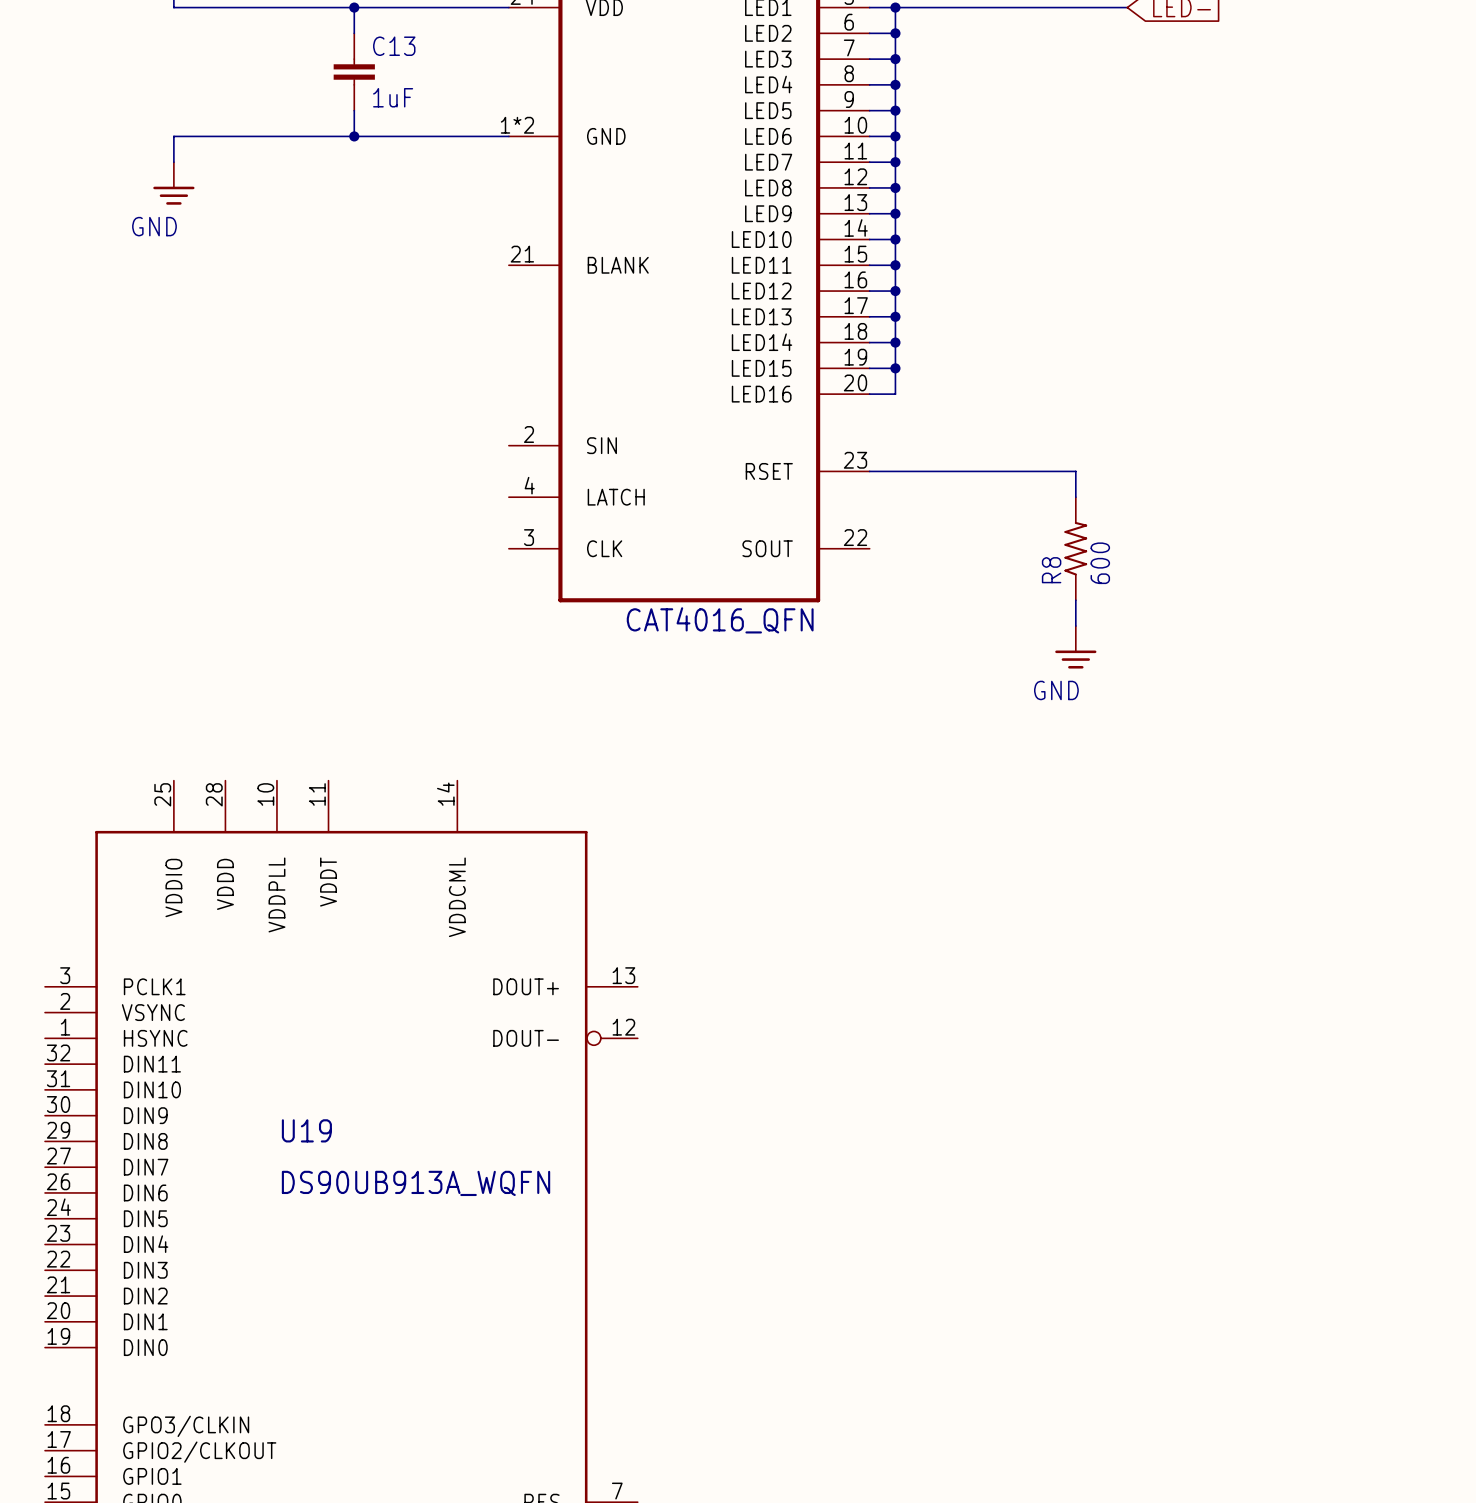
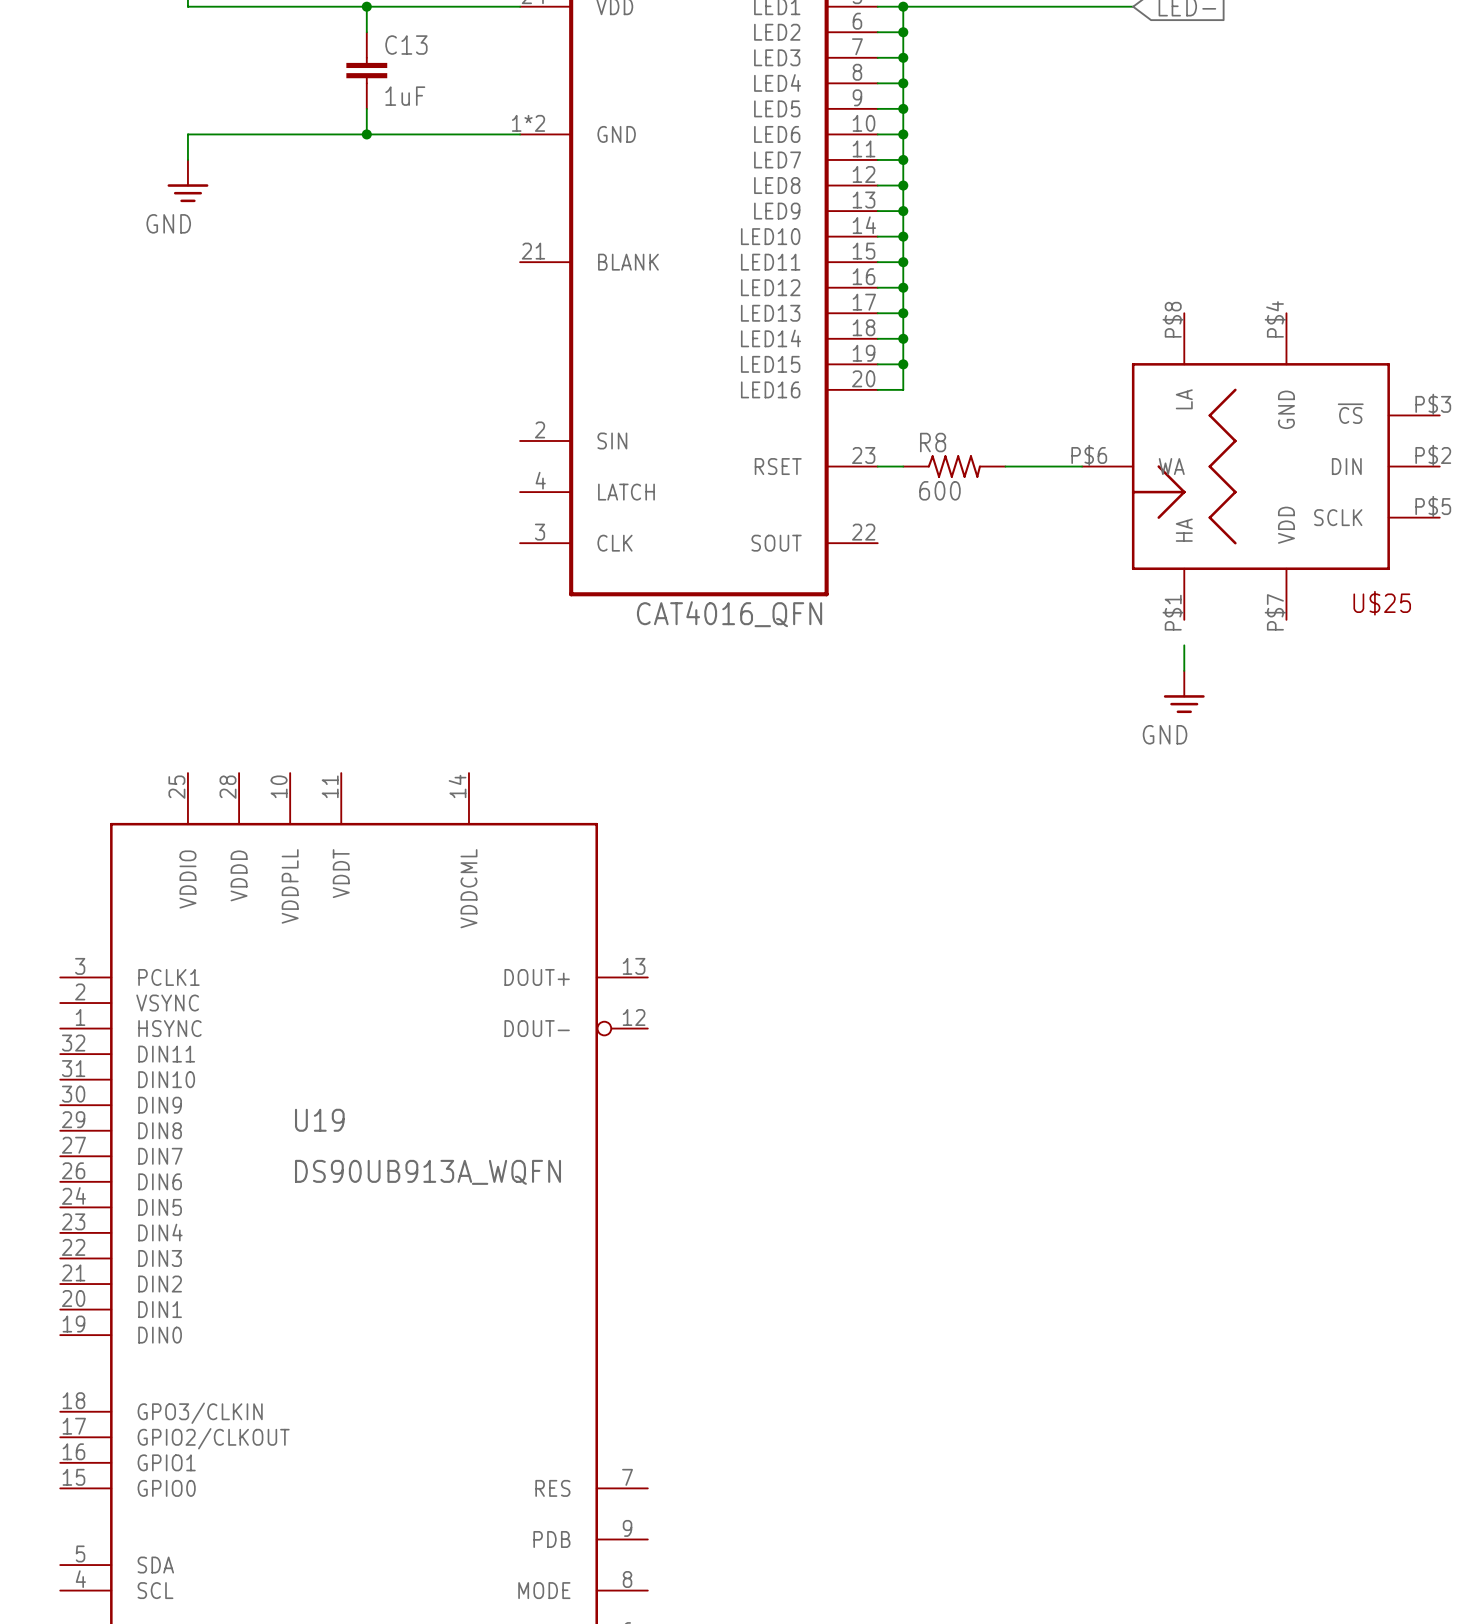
wire: (1075, 471) (1075, 497) -> none
U$25: none -> (1260, 466)
R8 rotation: 0° (1075, 548) -> 90° clockwise (954, 466)
R8 position: (1075, 548) -> (954, 466)
wire: (1075, 600) (1075, 626) -> (1184, 645) (1184, 670)
power symbol position: GND (1075, 647) -> GND (1184, 691)

